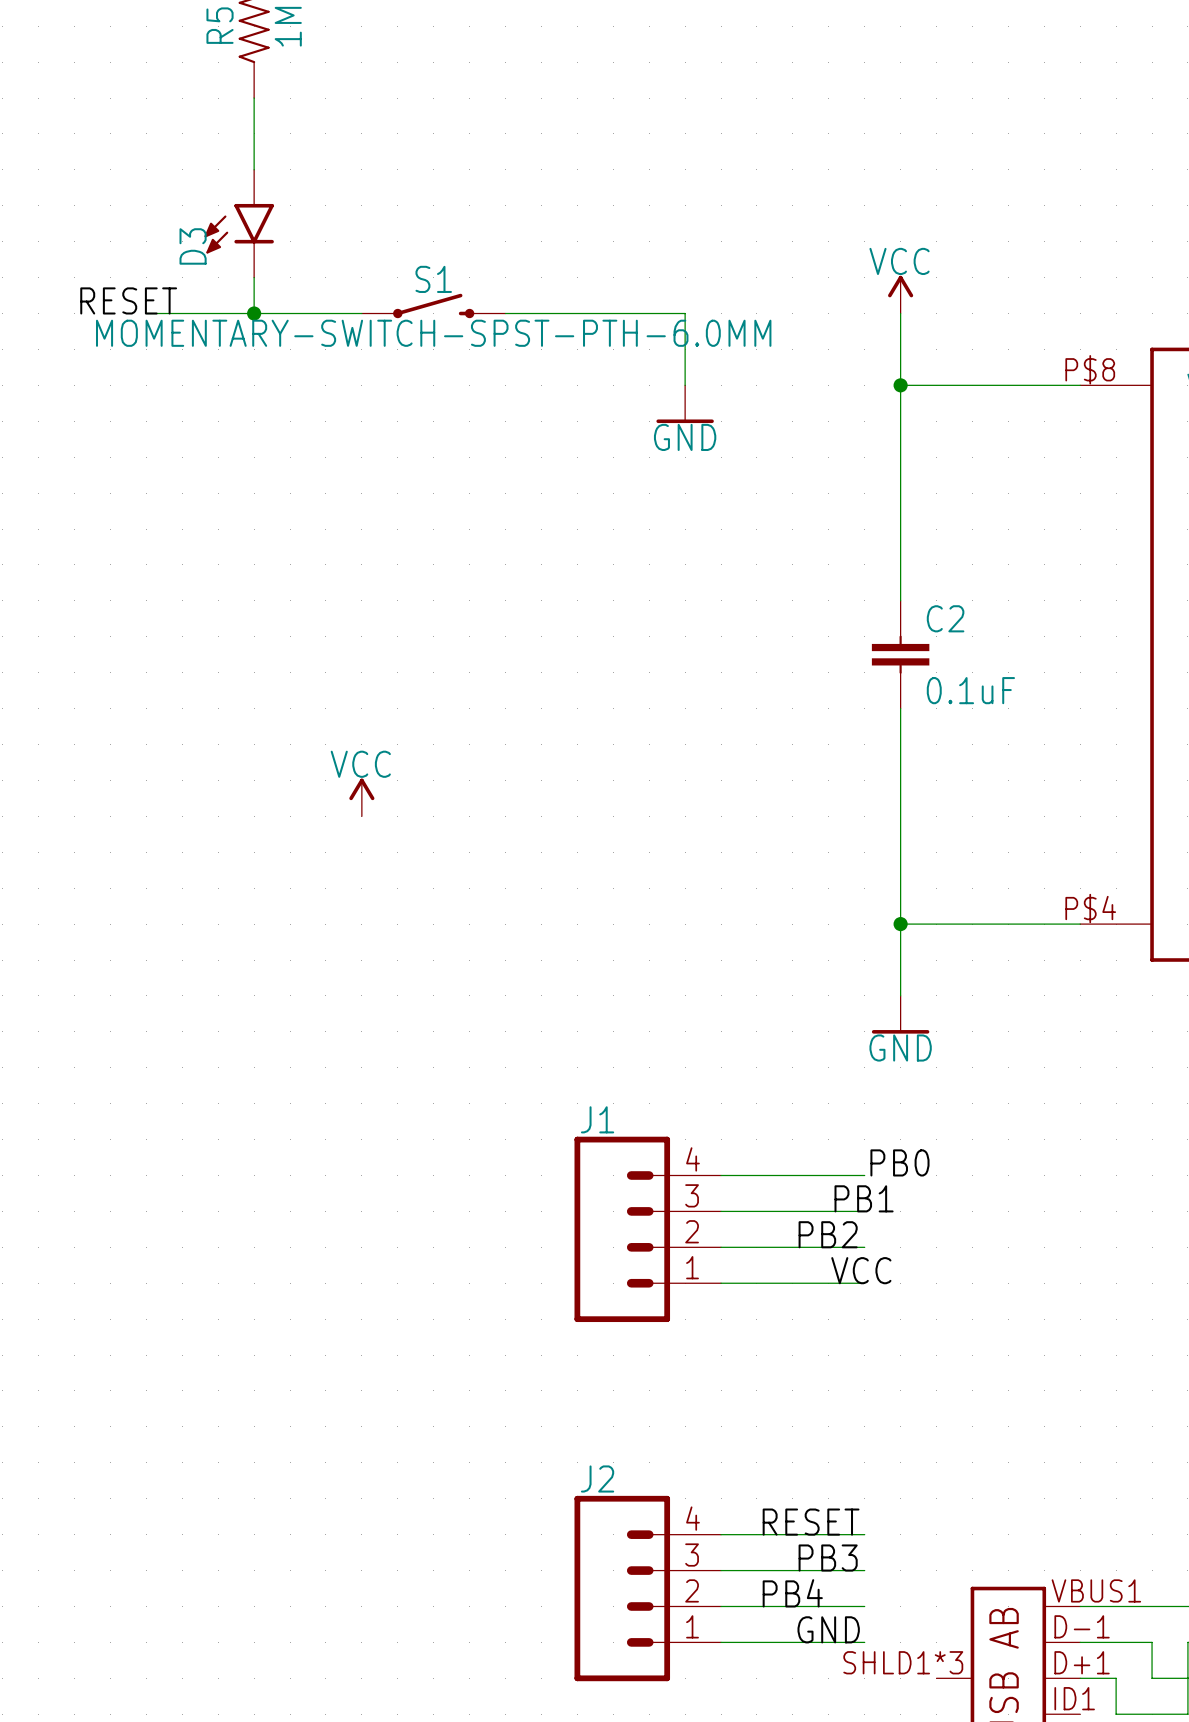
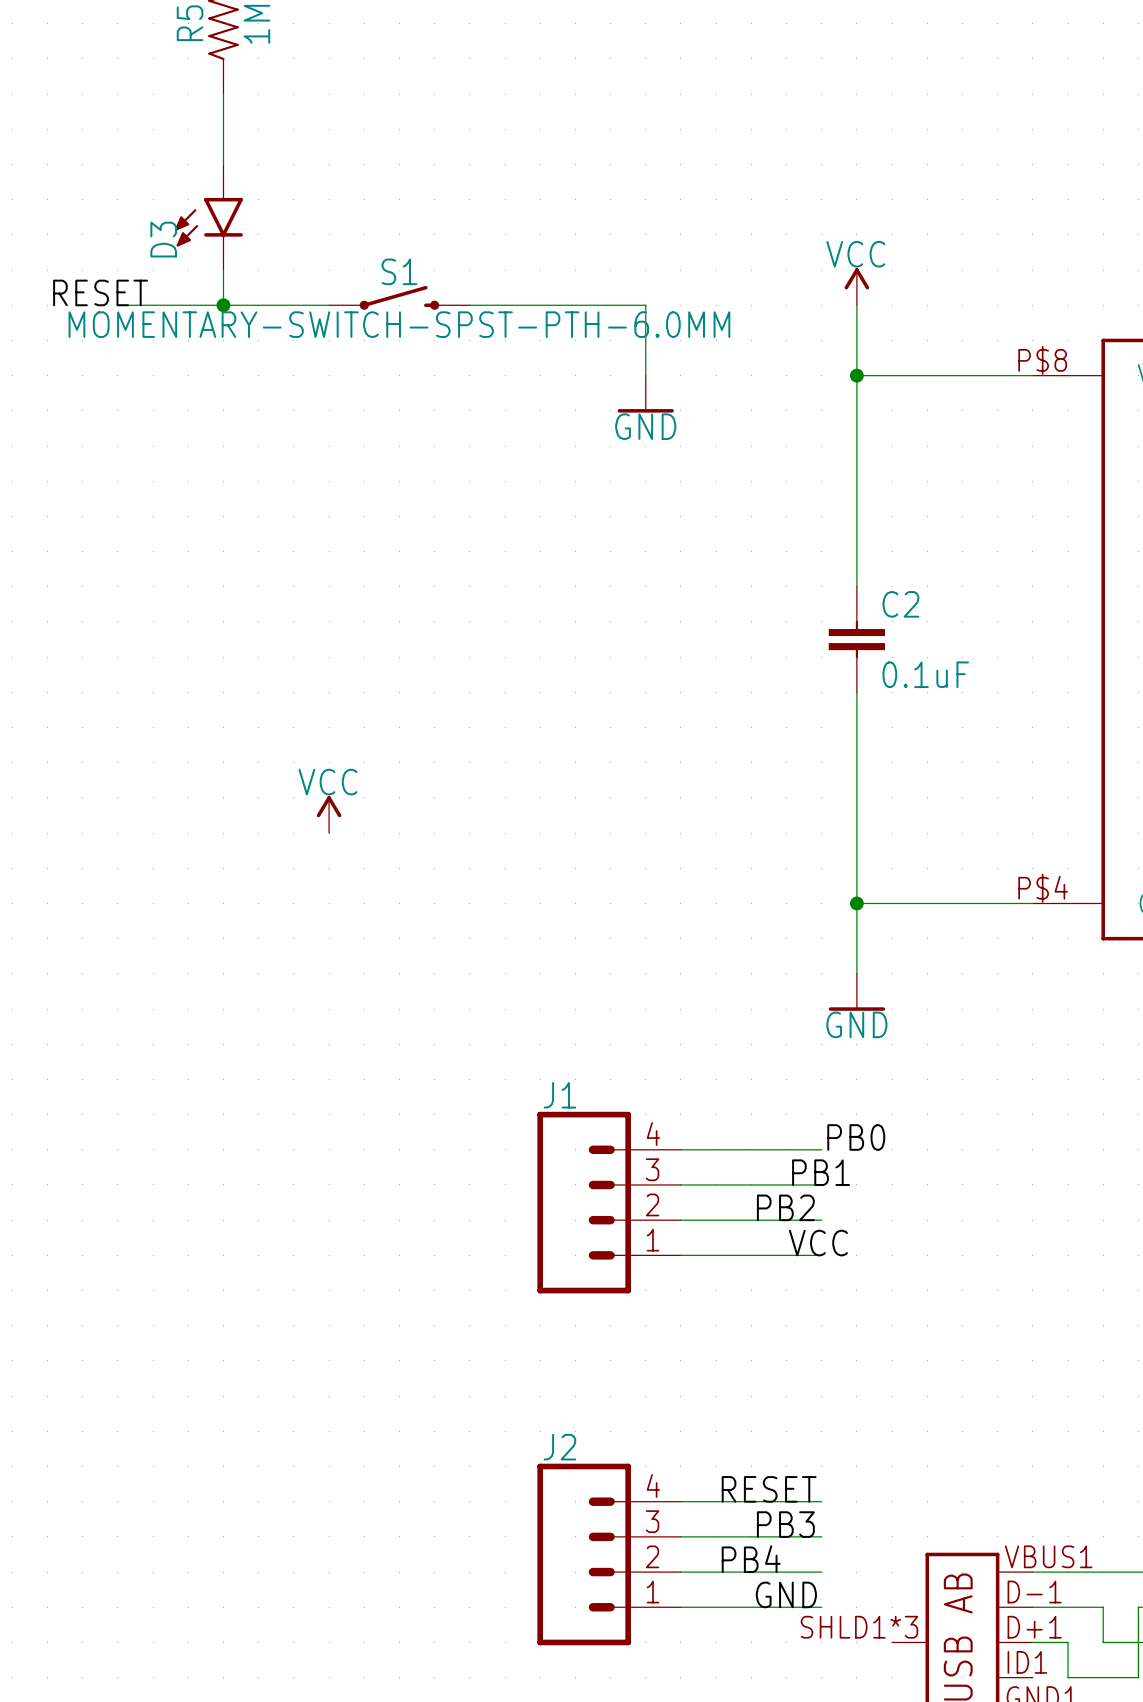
power symbol position: VCC (361, 797) -> VCC (329, 814)

